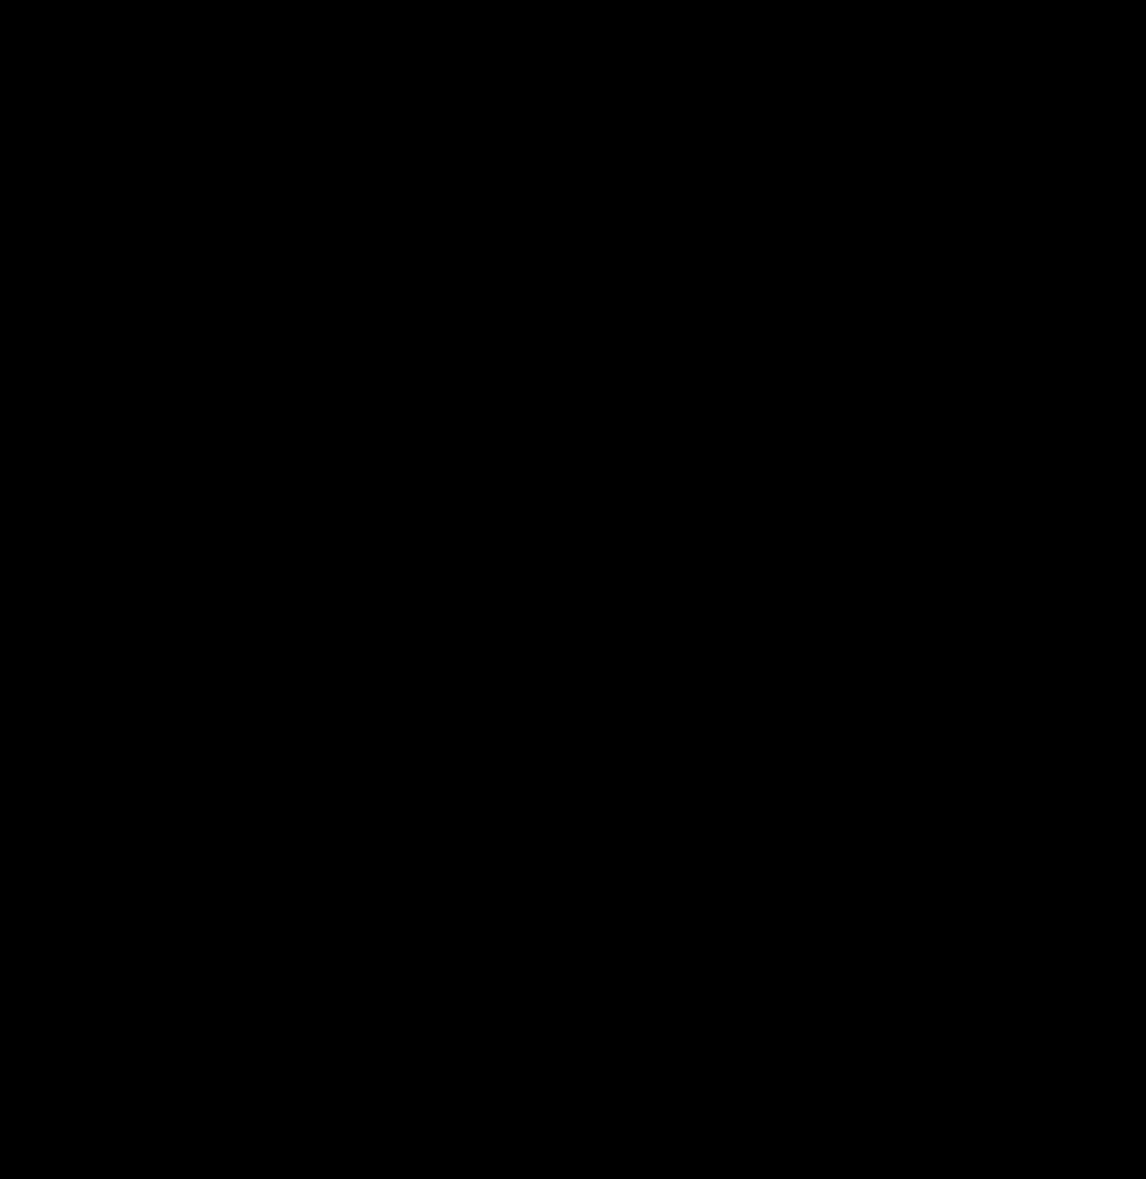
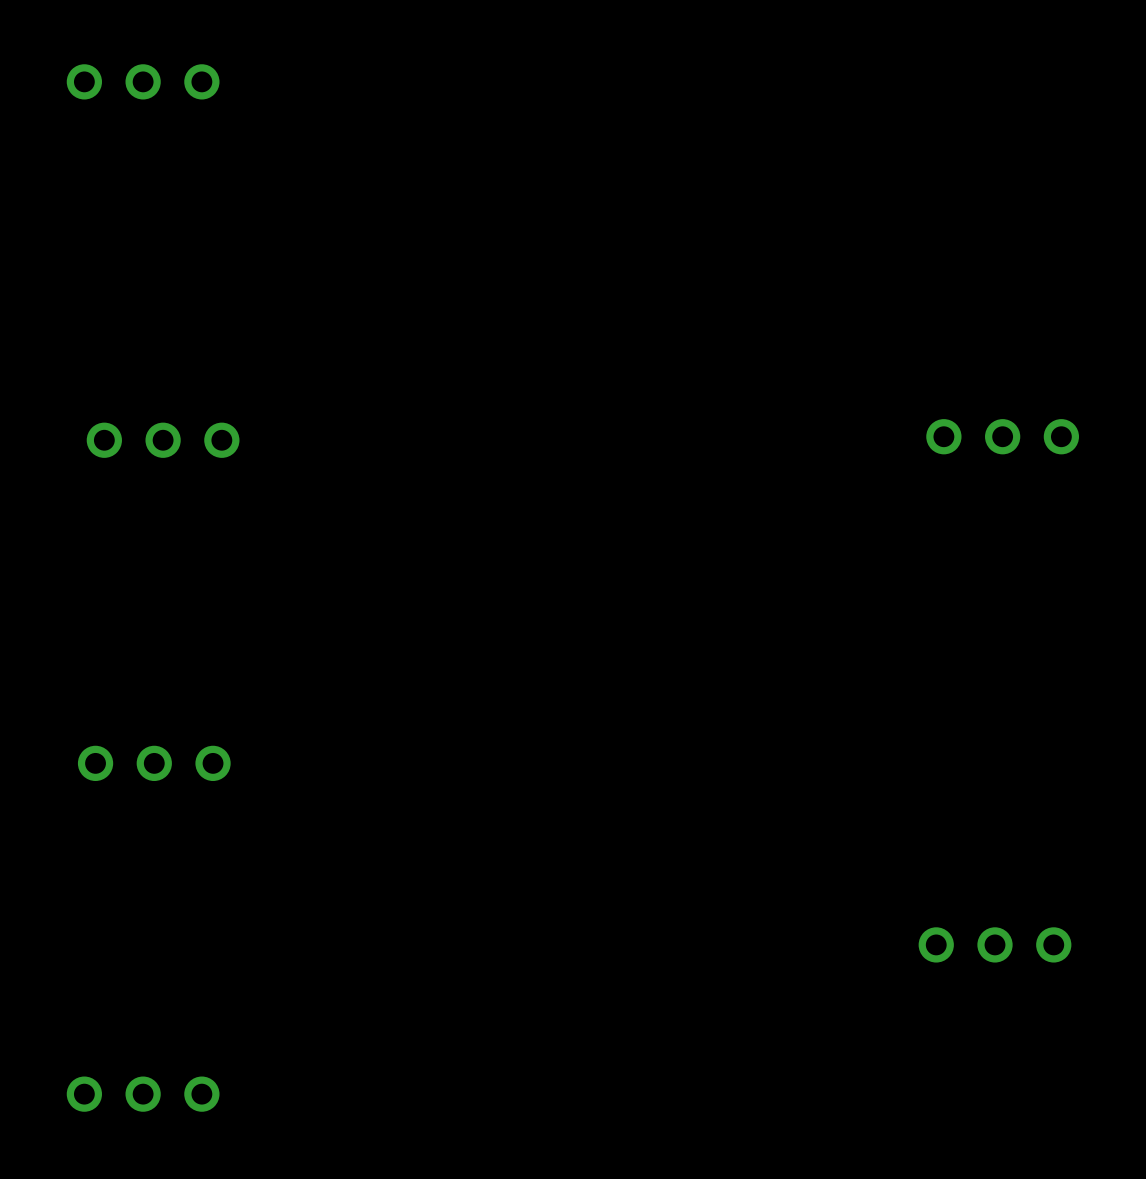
part: none -> (143, 81)
part: none -> (1002, 436)
part: none -> (163, 440)
part: none -> (154, 763)
part: none -> (995, 944)
part: none -> (143, 1094)

